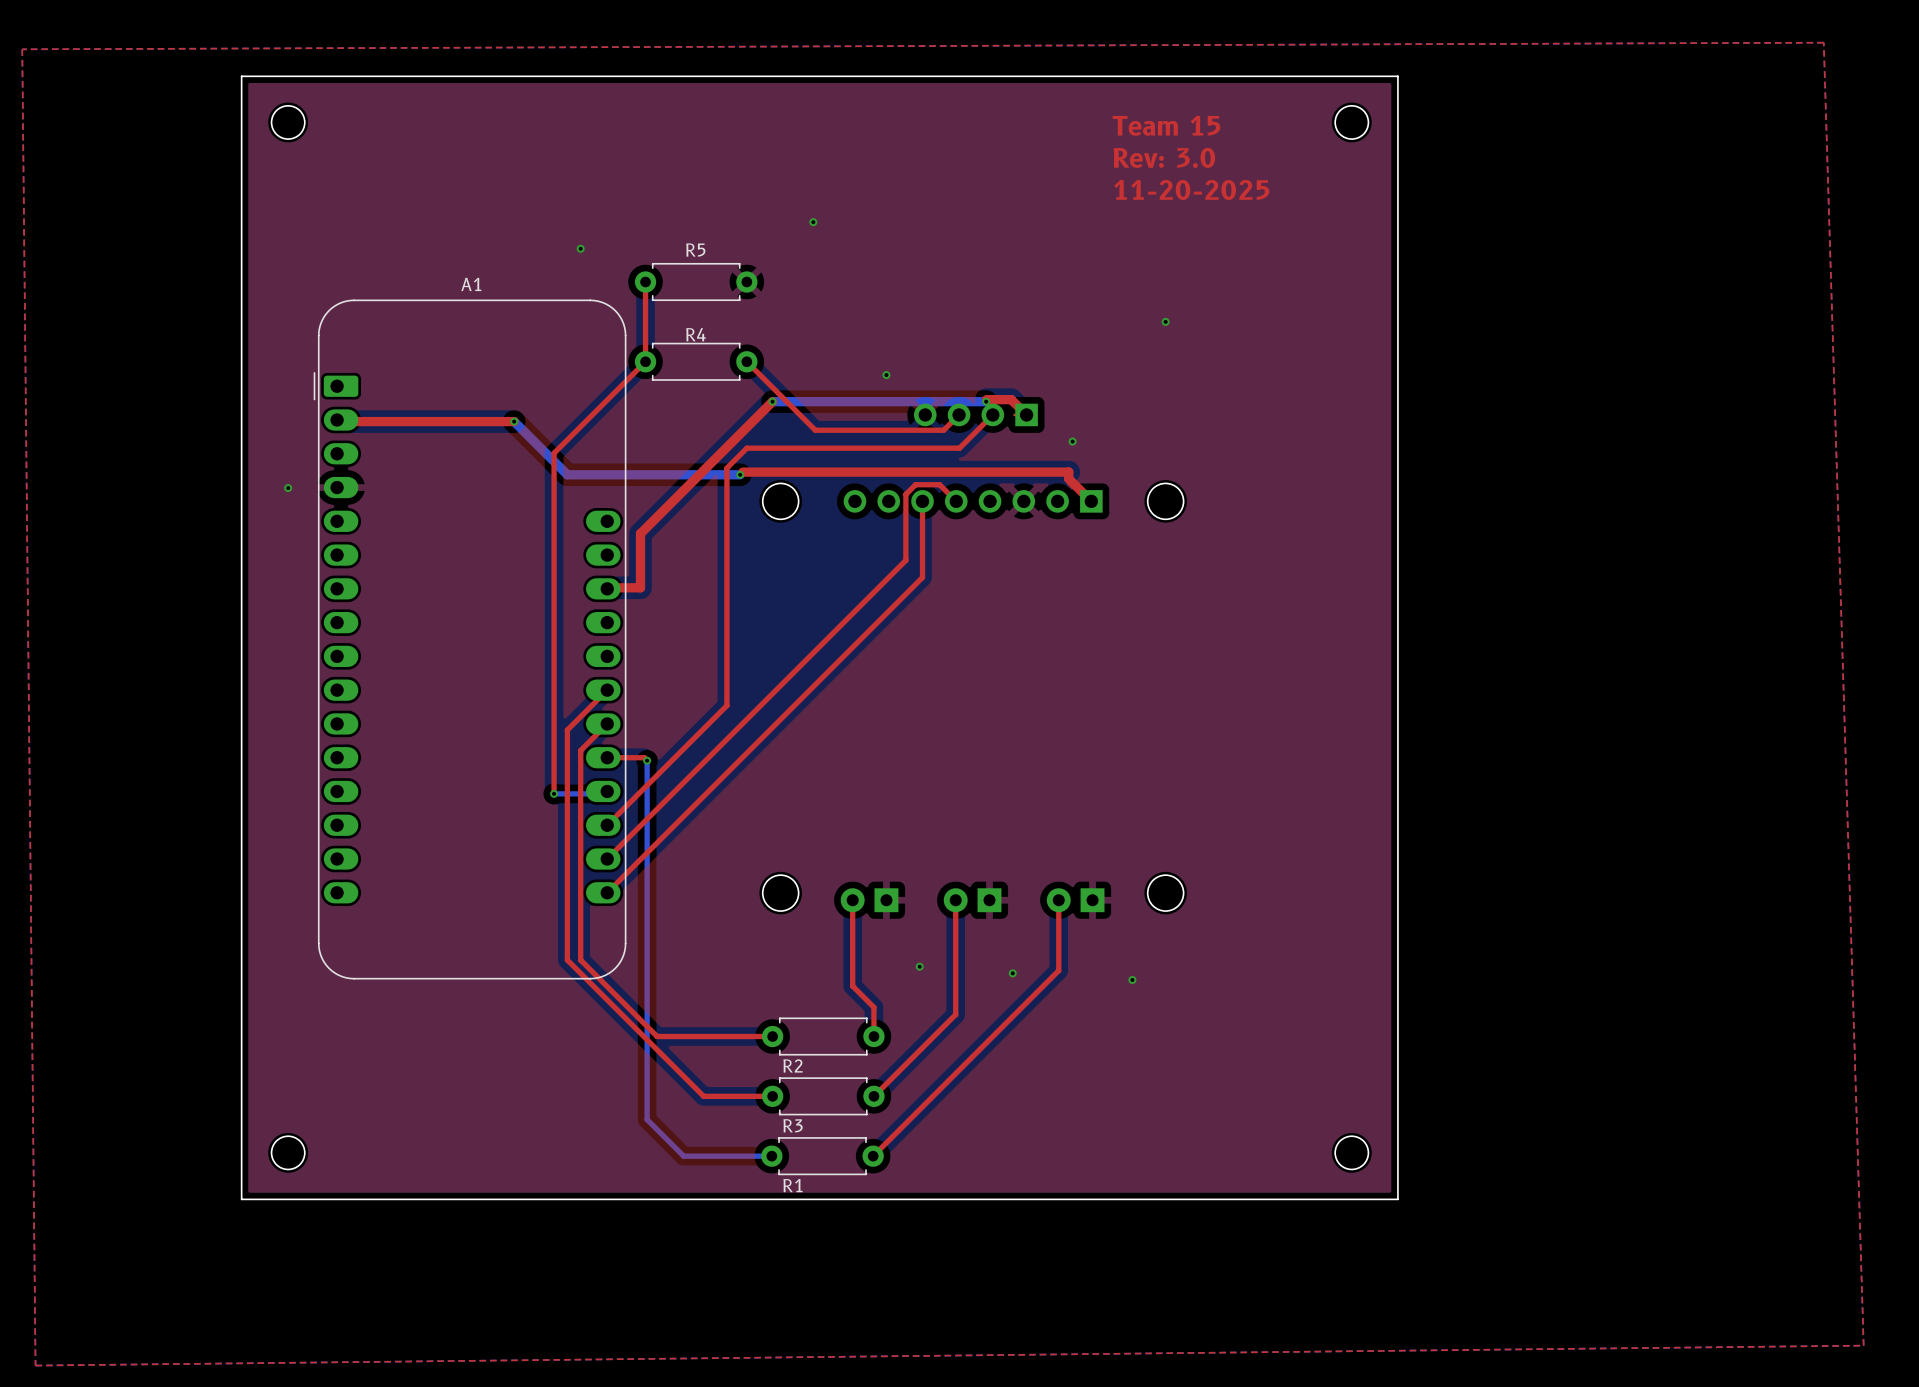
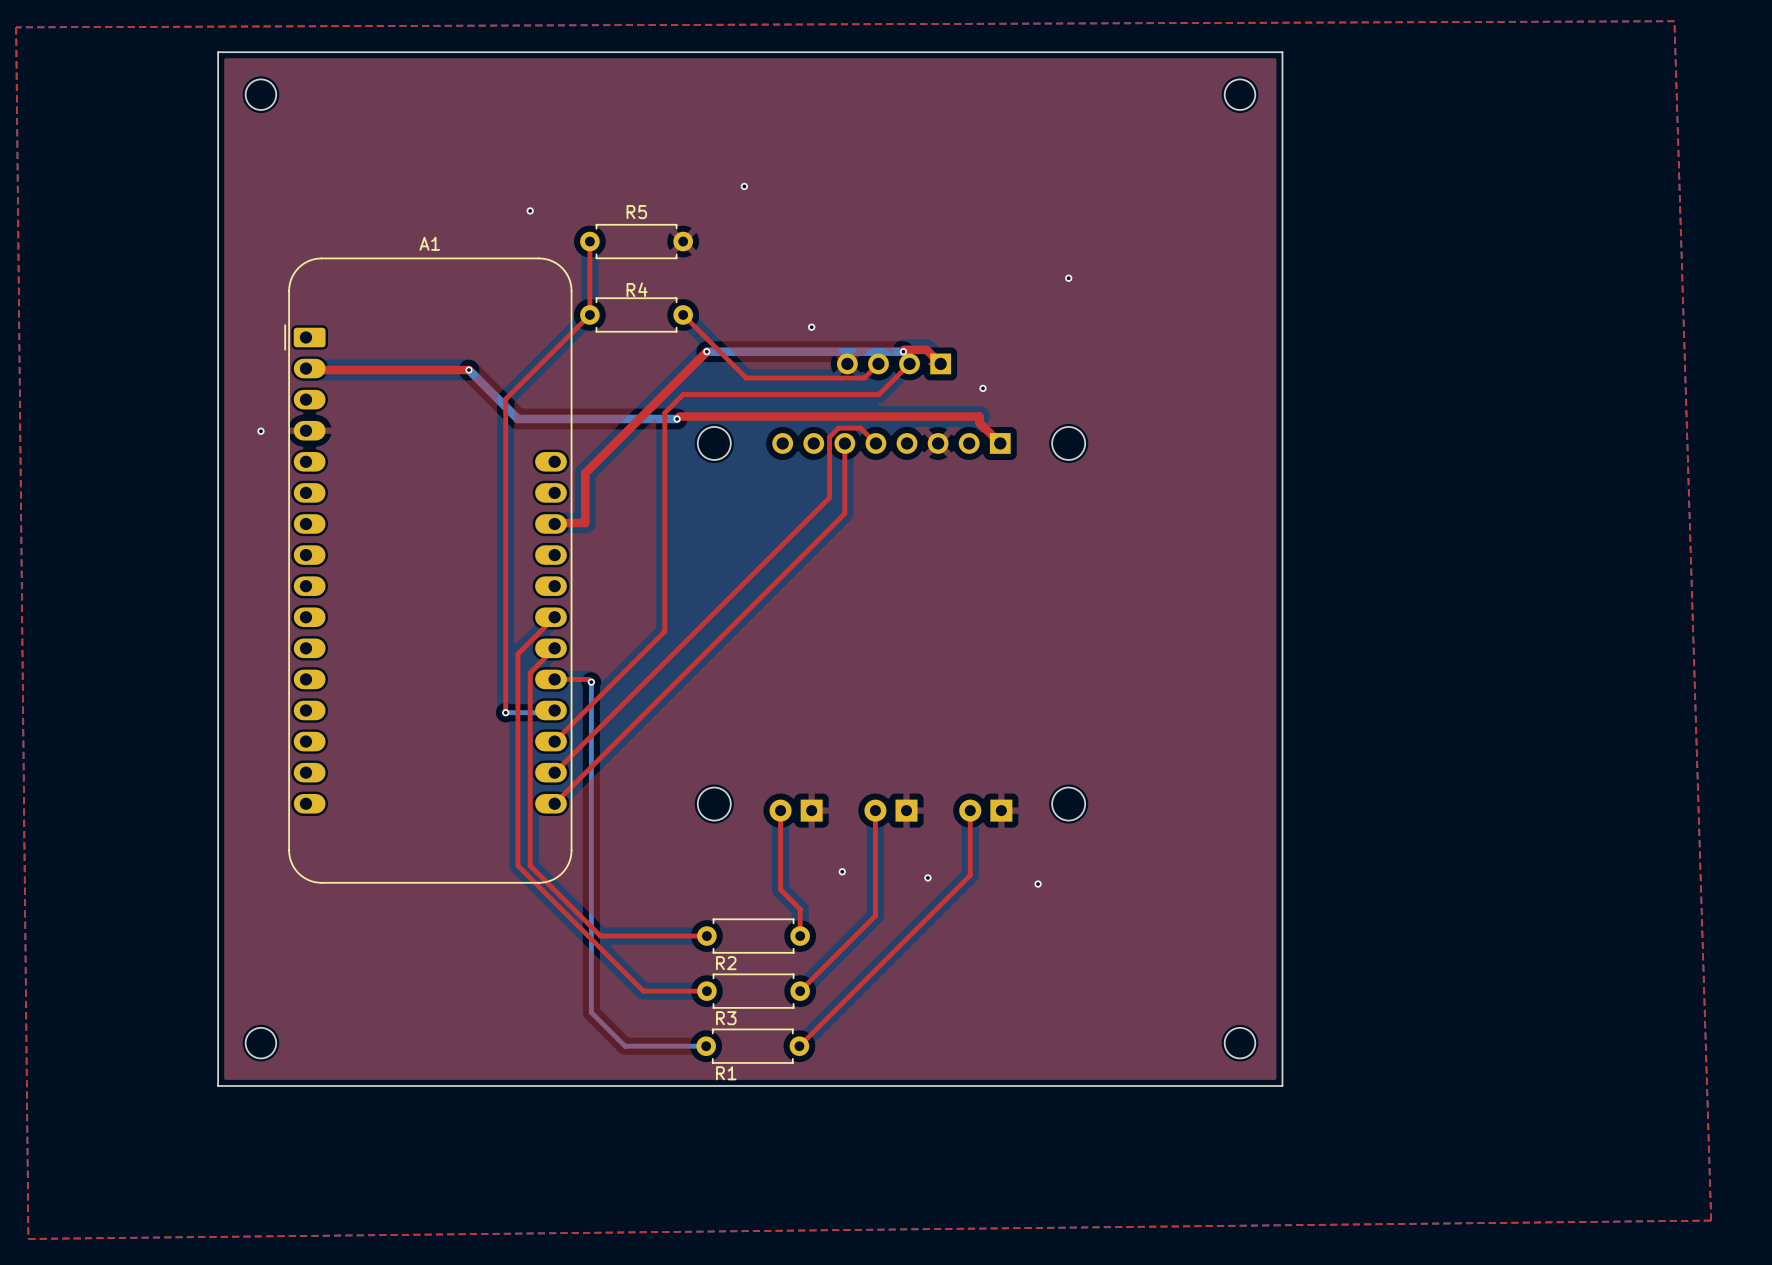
text: Team 15 (1166, 125) -> none
text: Rev: 3.0 (1164, 157) -> none
text: 11-20-2025 (1191, 189) -> none

